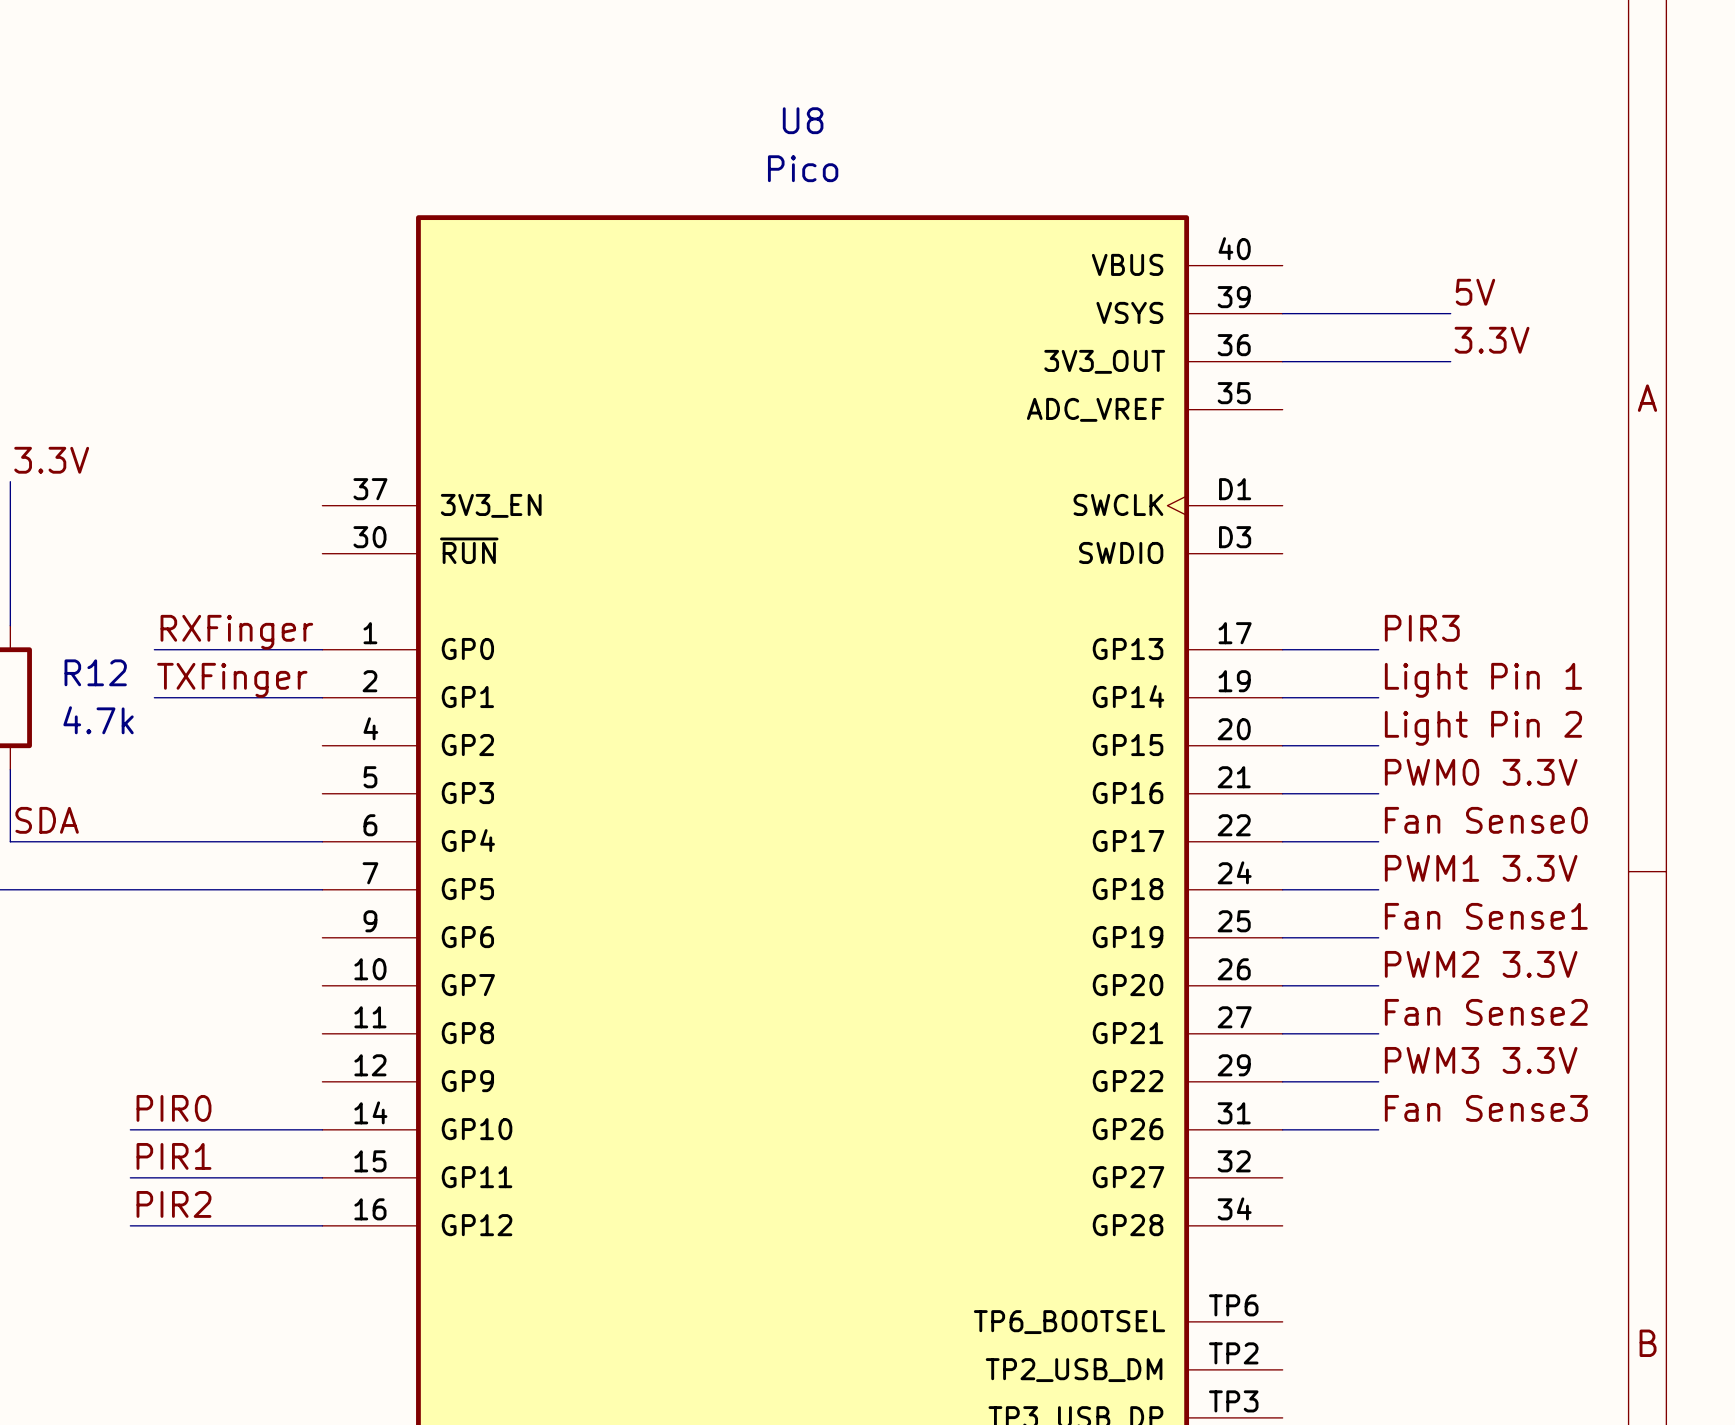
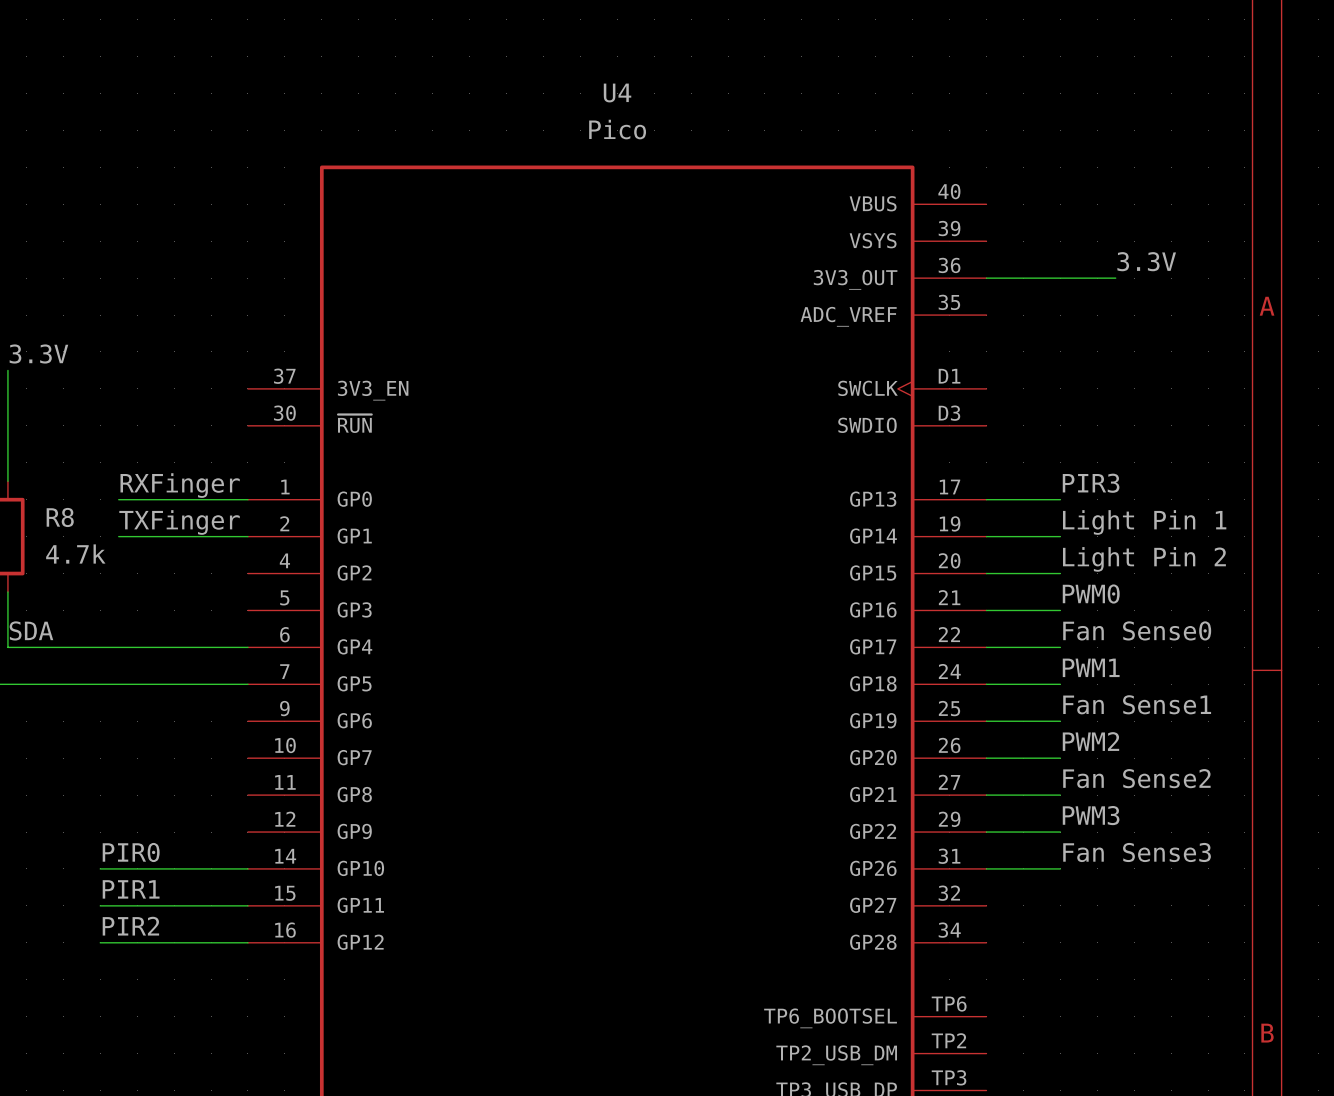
U8 name: U8 (803, 120) -> U4 (617, 93)
label: 5V (1475, 292) -> none
wire: (1282, 313) (1450, 313) -> none
R12 name: R12 (95, 672) -> R8 (60, 517)
label: PWM0 3.3V (1481, 772) -> PWM0 (1091, 594)
label: PWM1 3.3V (1481, 868) -> PWM1 (1091, 667)
label: PWM2 3.3V (1481, 964) -> PWM2 (1090, 741)
label: PWM3 3.3V (1481, 1060) -> PWM3 (1091, 815)

